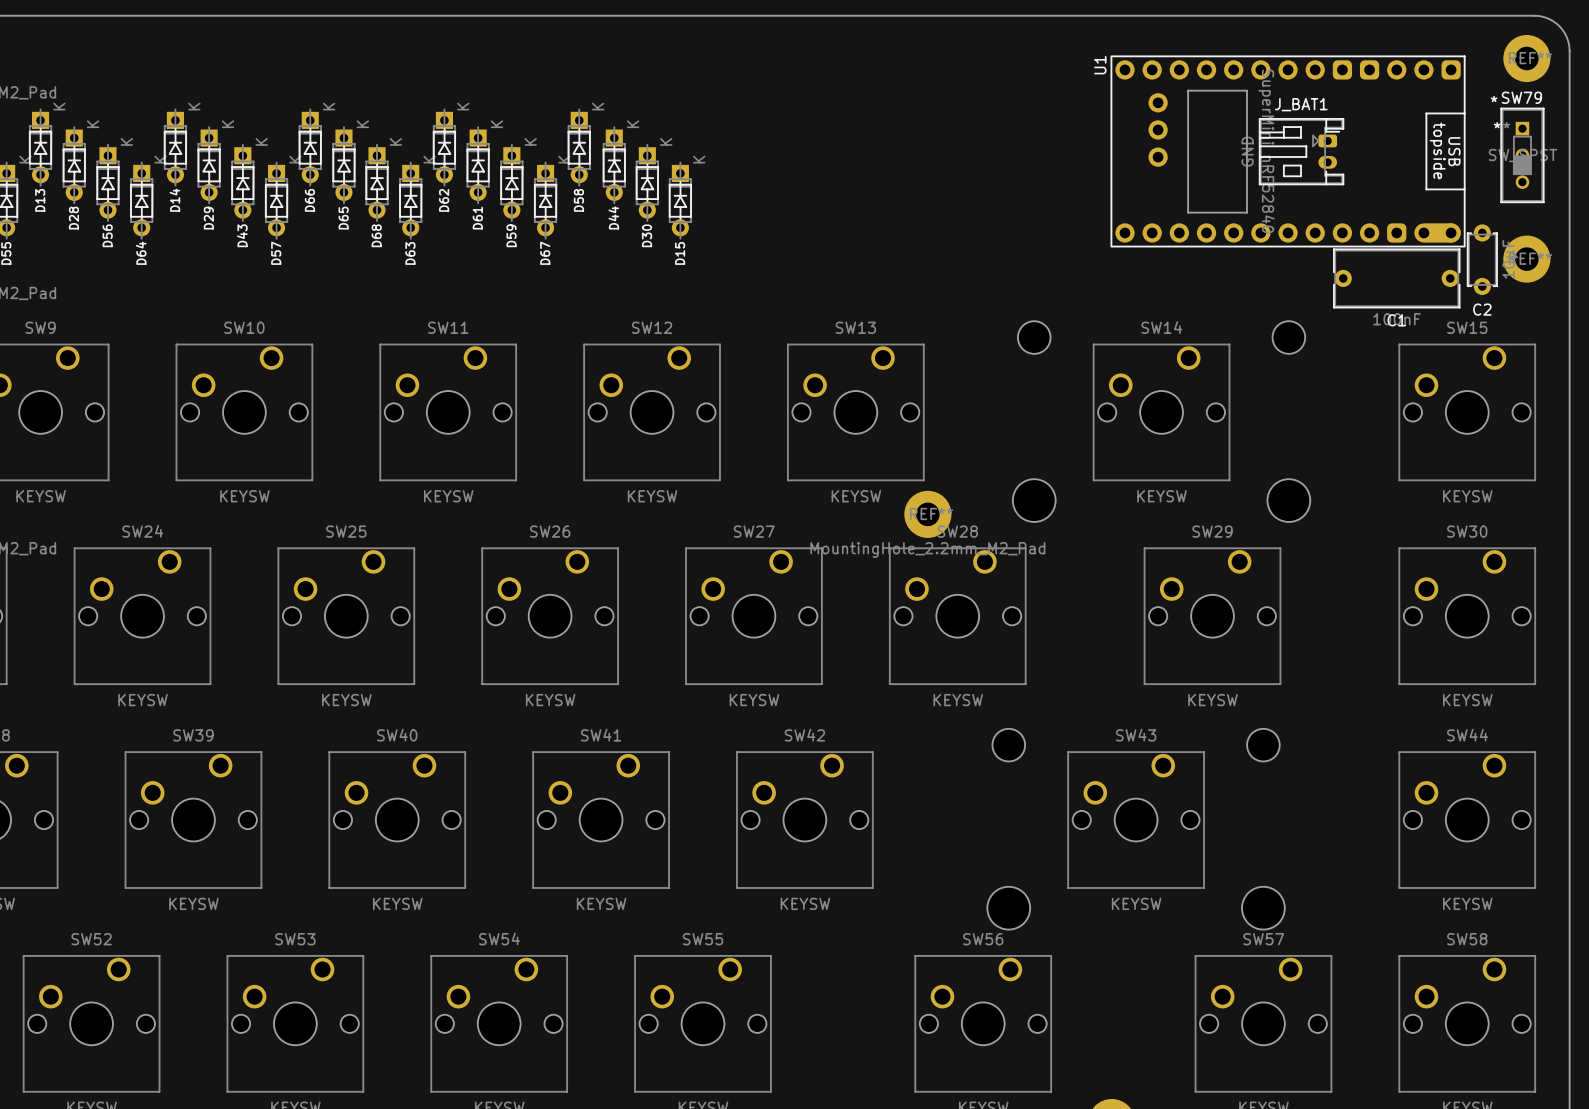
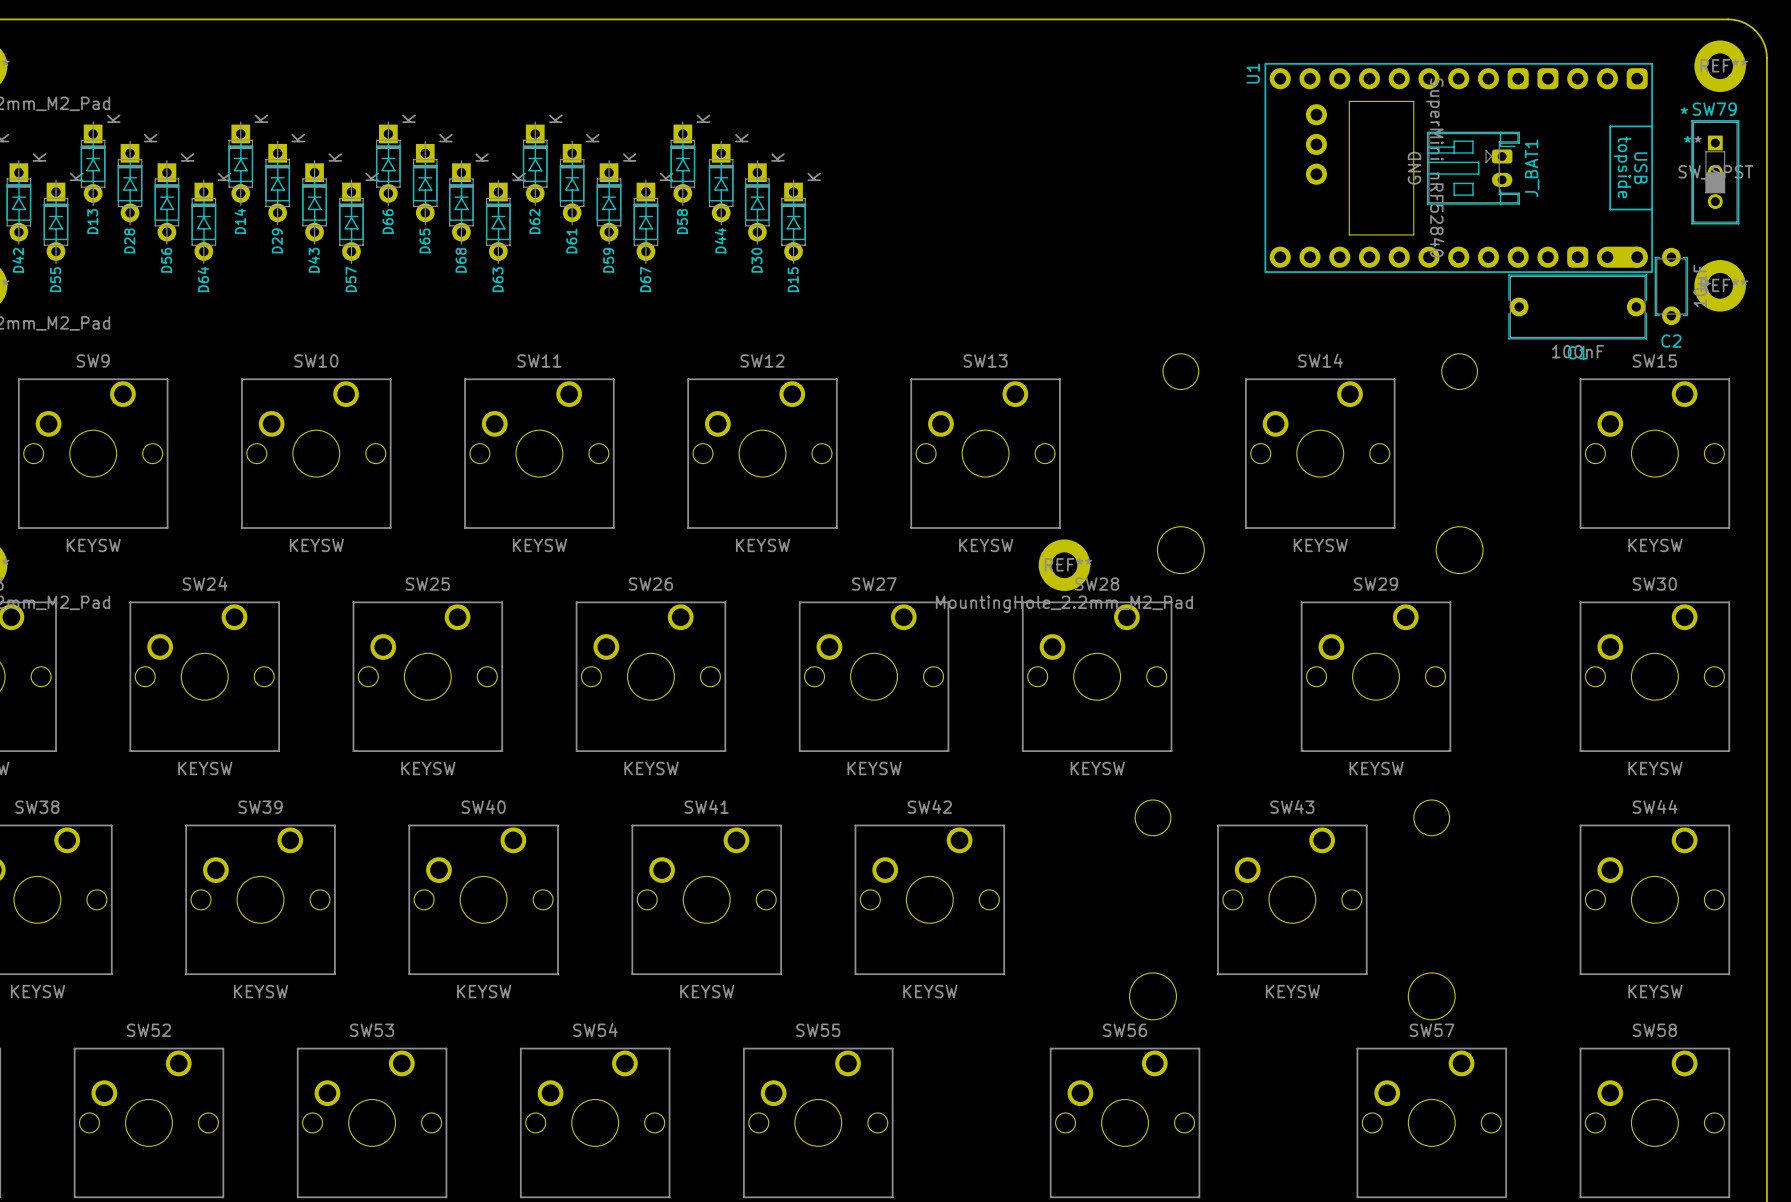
J_BAT1 name rotation: 0° (1301, 104) -> 90° counterclockwise (1532, 168)
J_BAT1 name position: J_BAT1 (1301, 104) -> J_BAT1 (1532, 168)

